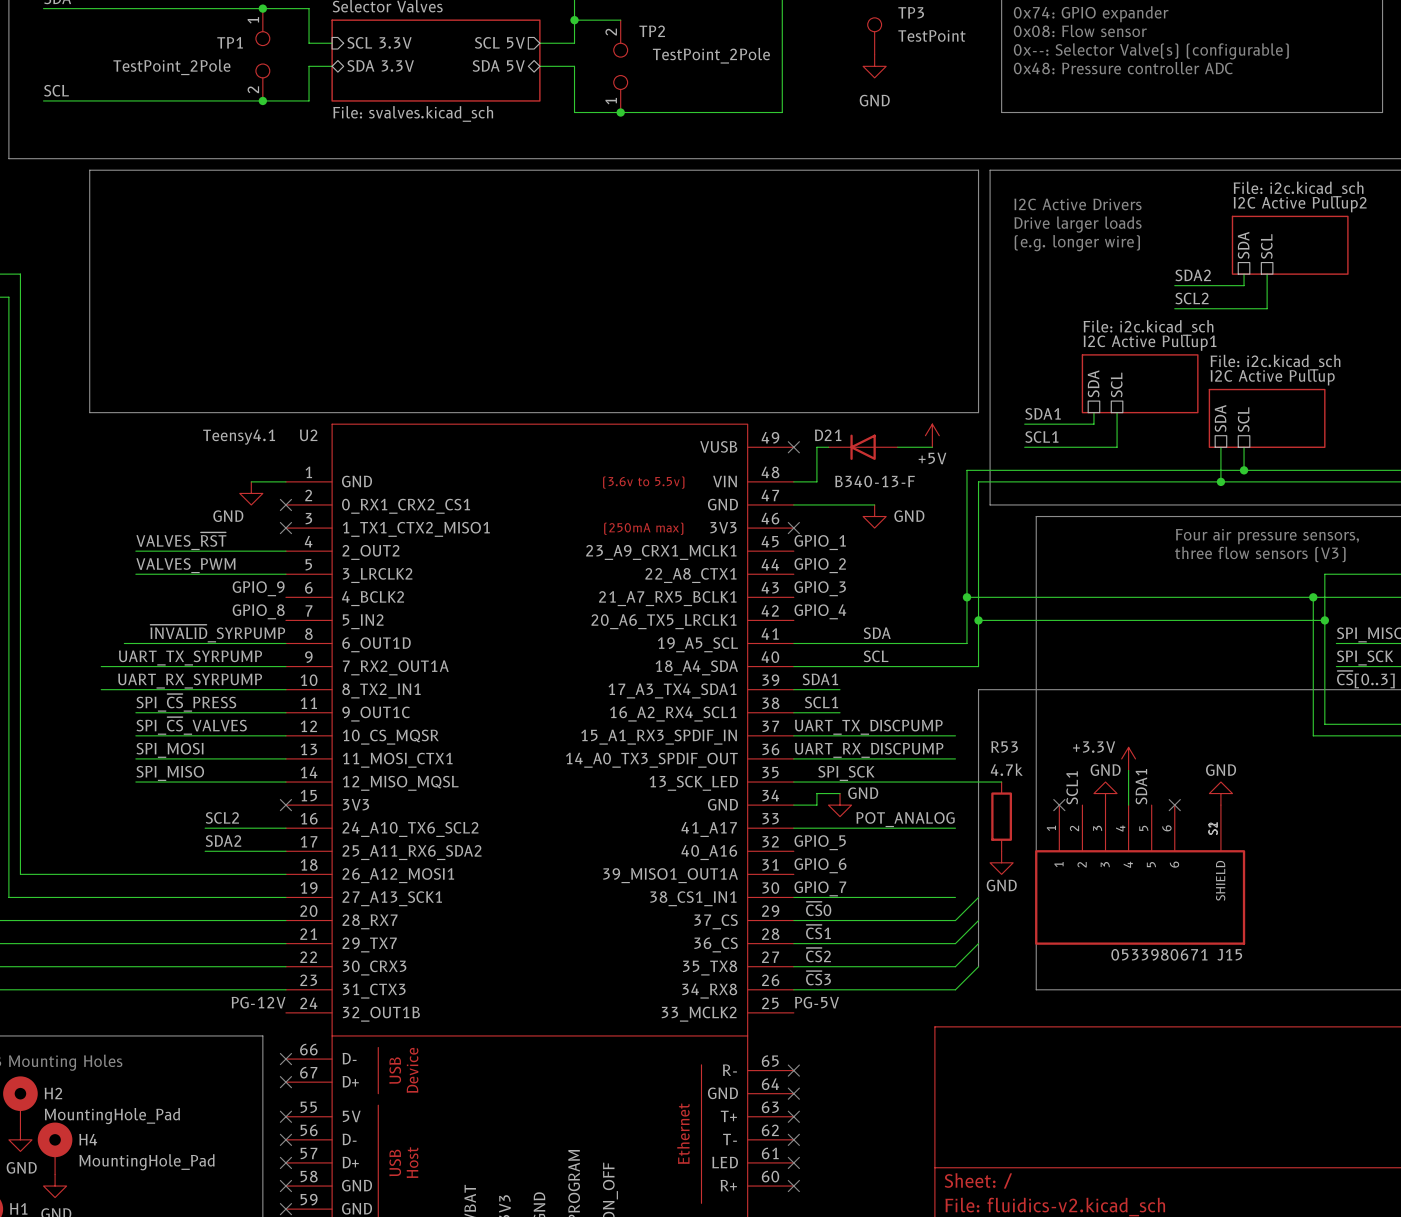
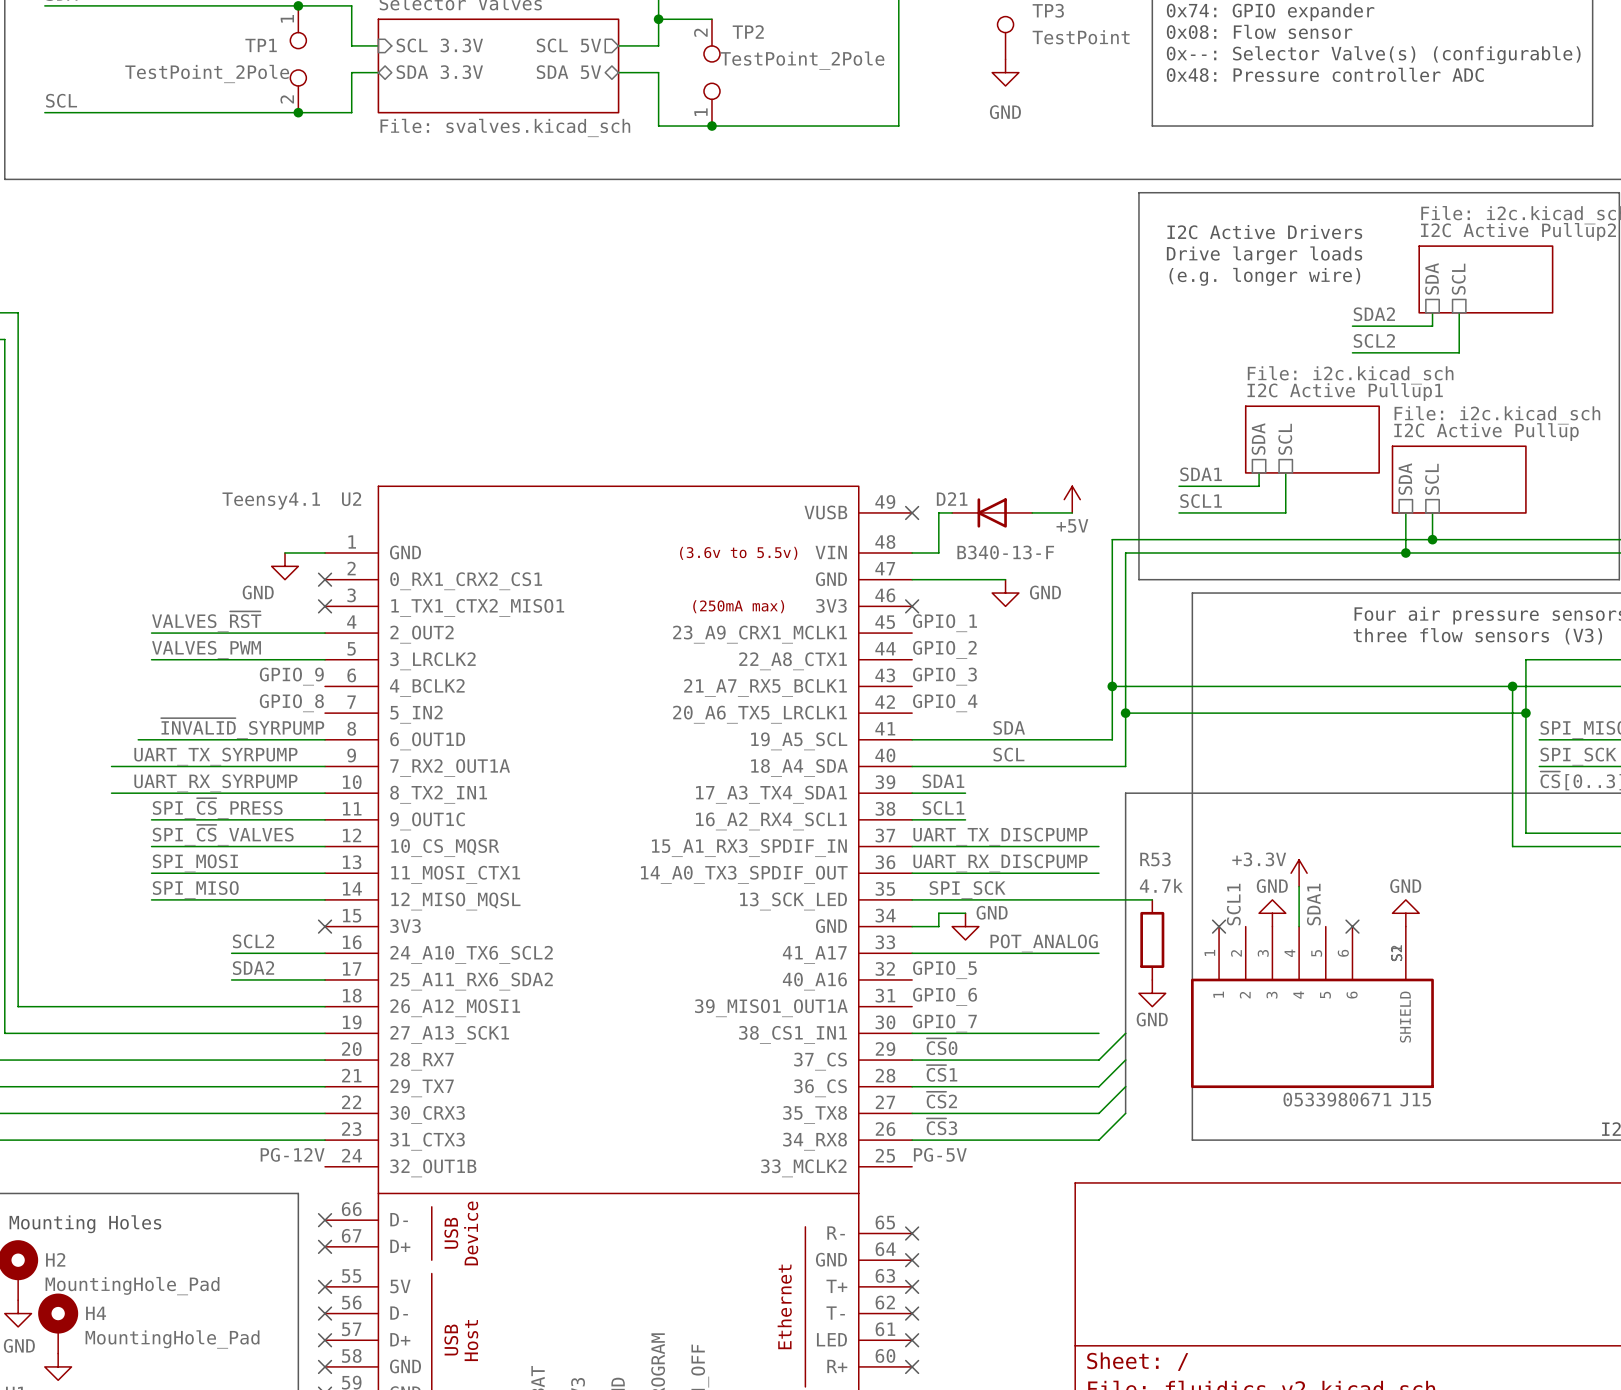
line: (89, 170) (978, 170) (978, 412) (89, 412) (89, 170) -> none

